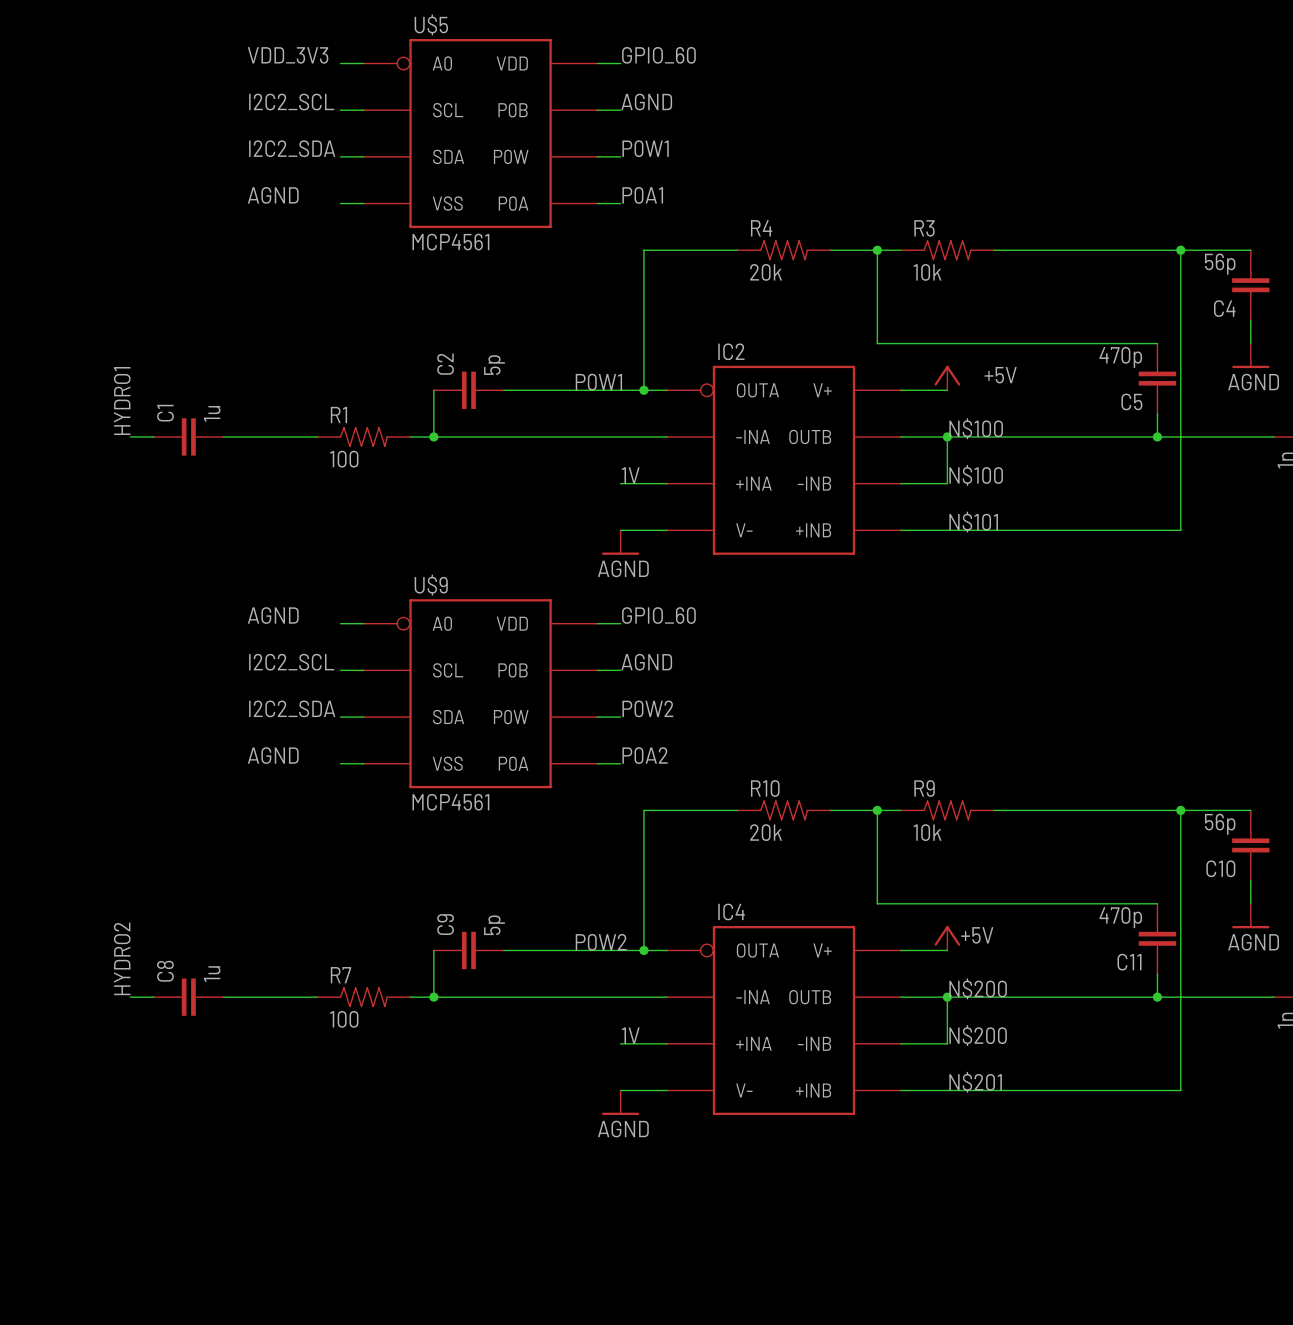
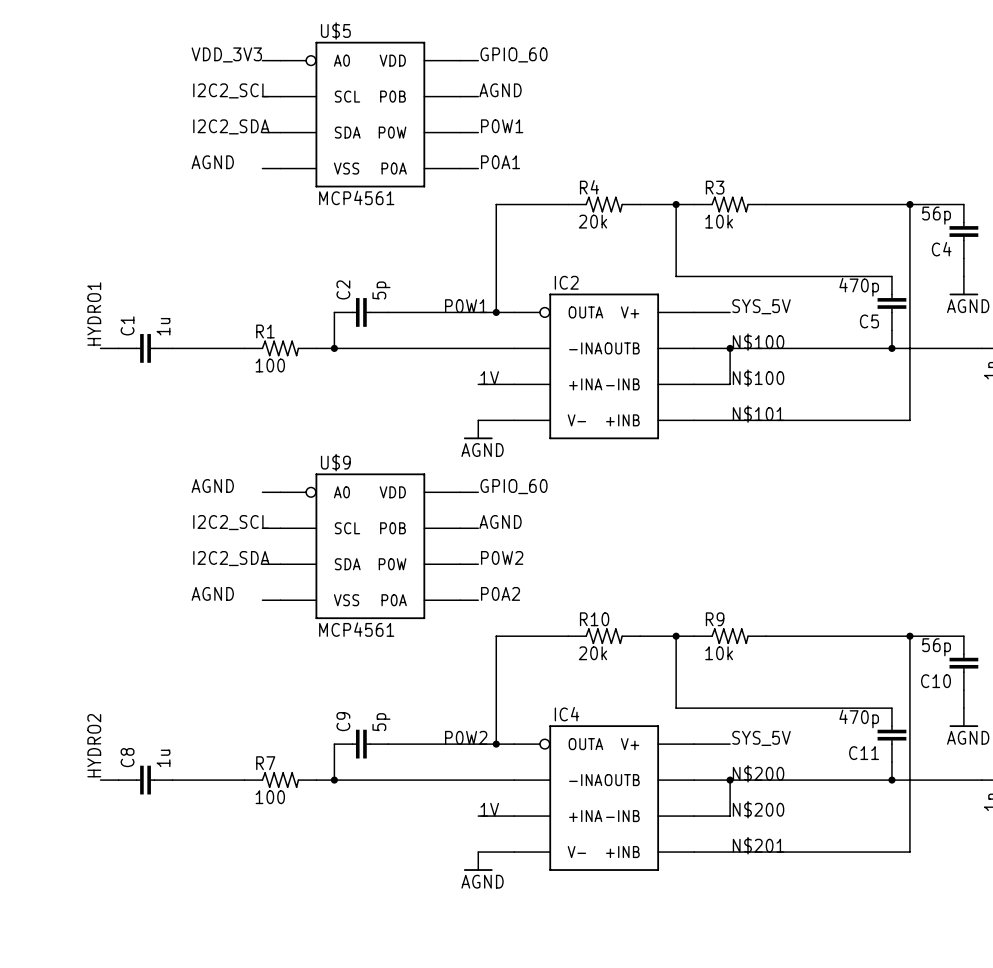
power symbol: +5V (947, 378) -> none
label: none -> SYS_5V (761, 306)
power symbol: +5V (947, 938) -> none
label: none -> SYS_5V (761, 738)

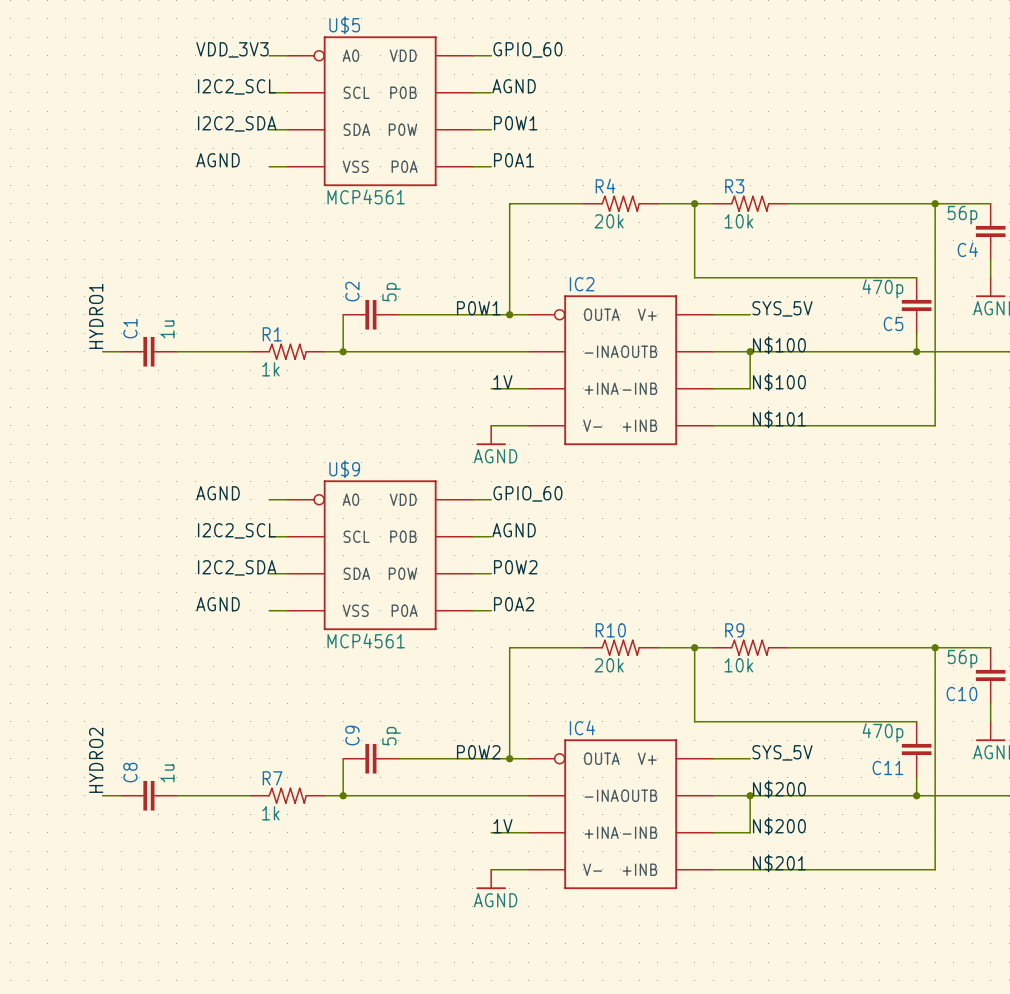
R1 value: 100 (270, 365) -> 1k (270, 369)
R7 value: 100 (270, 797) -> 1k (270, 813)

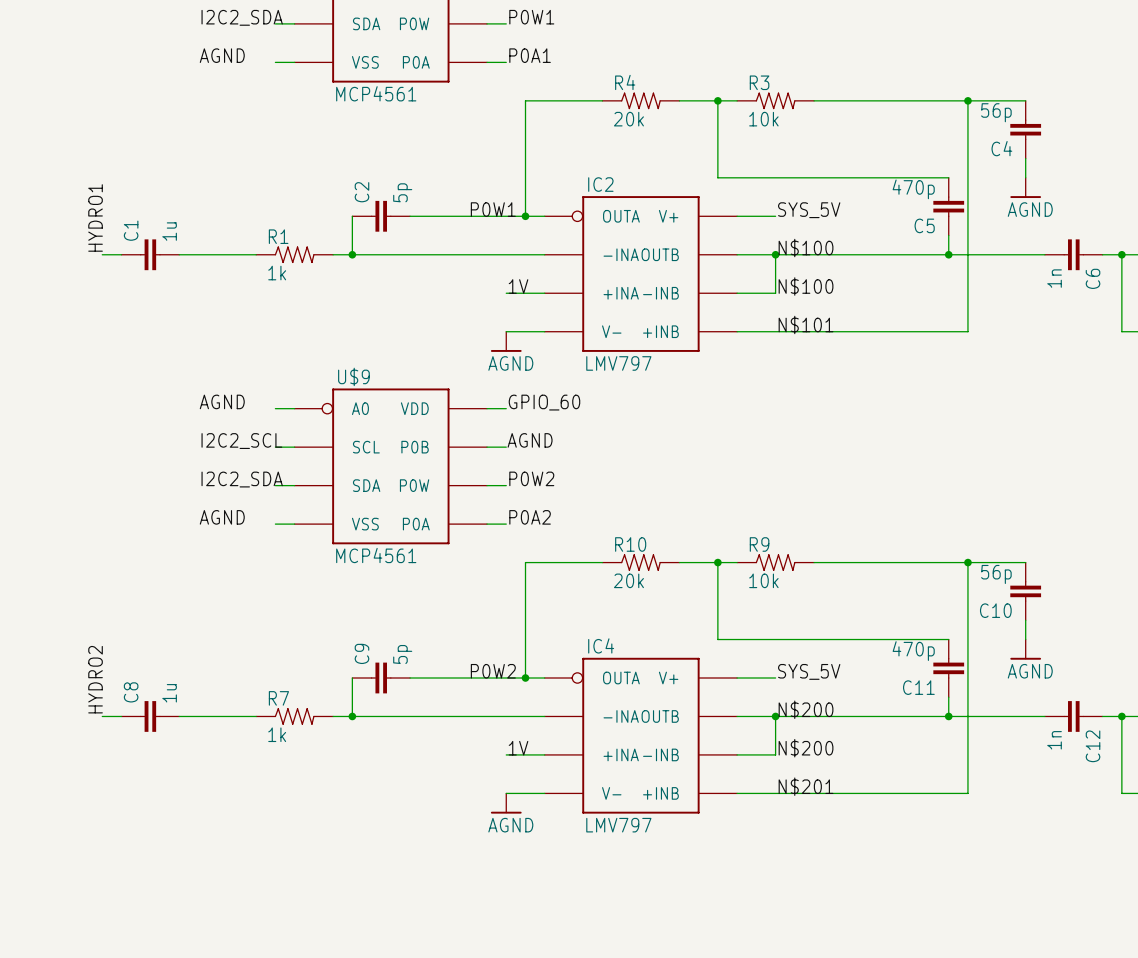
IC2 value: none -> LMV797 (618, 363)
IC4 value: none -> LMV797 (618, 825)

